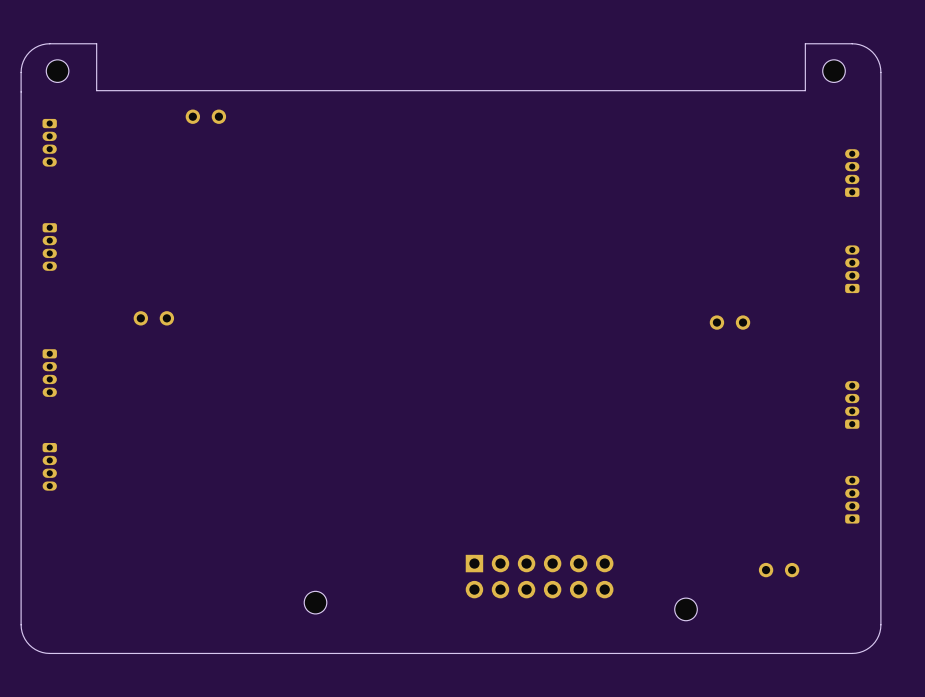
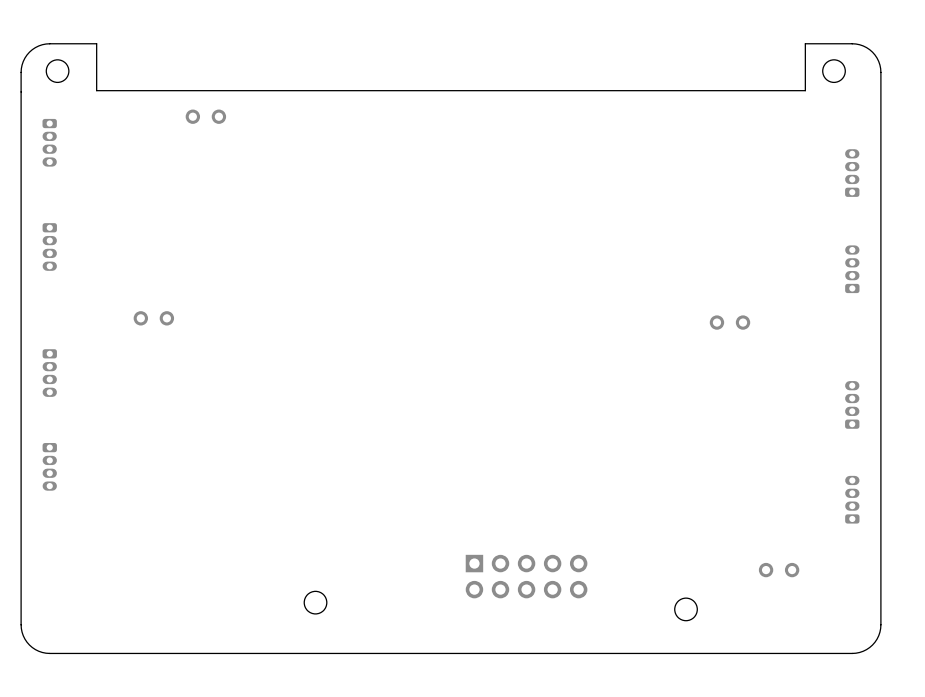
part: (539, 576) -> none

